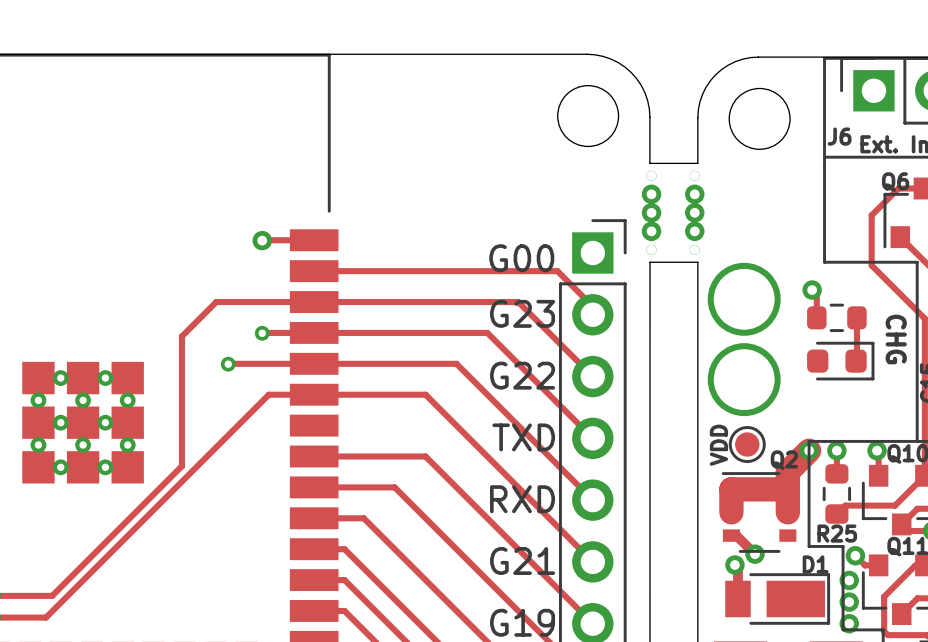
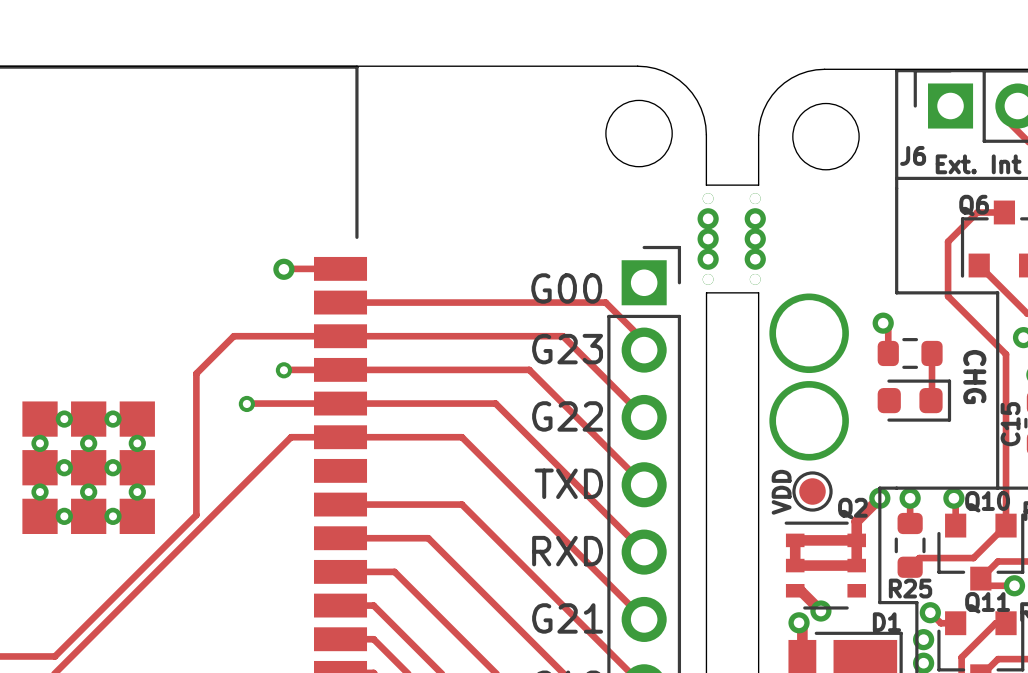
track width: thick (809, 450) (787, 471) (787, 512) -> thin (879, 498) (856, 521) (856, 565)
track width: thick (787, 489) (731, 489) (731, 512) -> thin (856, 540) (795, 540) (795, 565)
track: none -> (795, 565) (856, 565)

